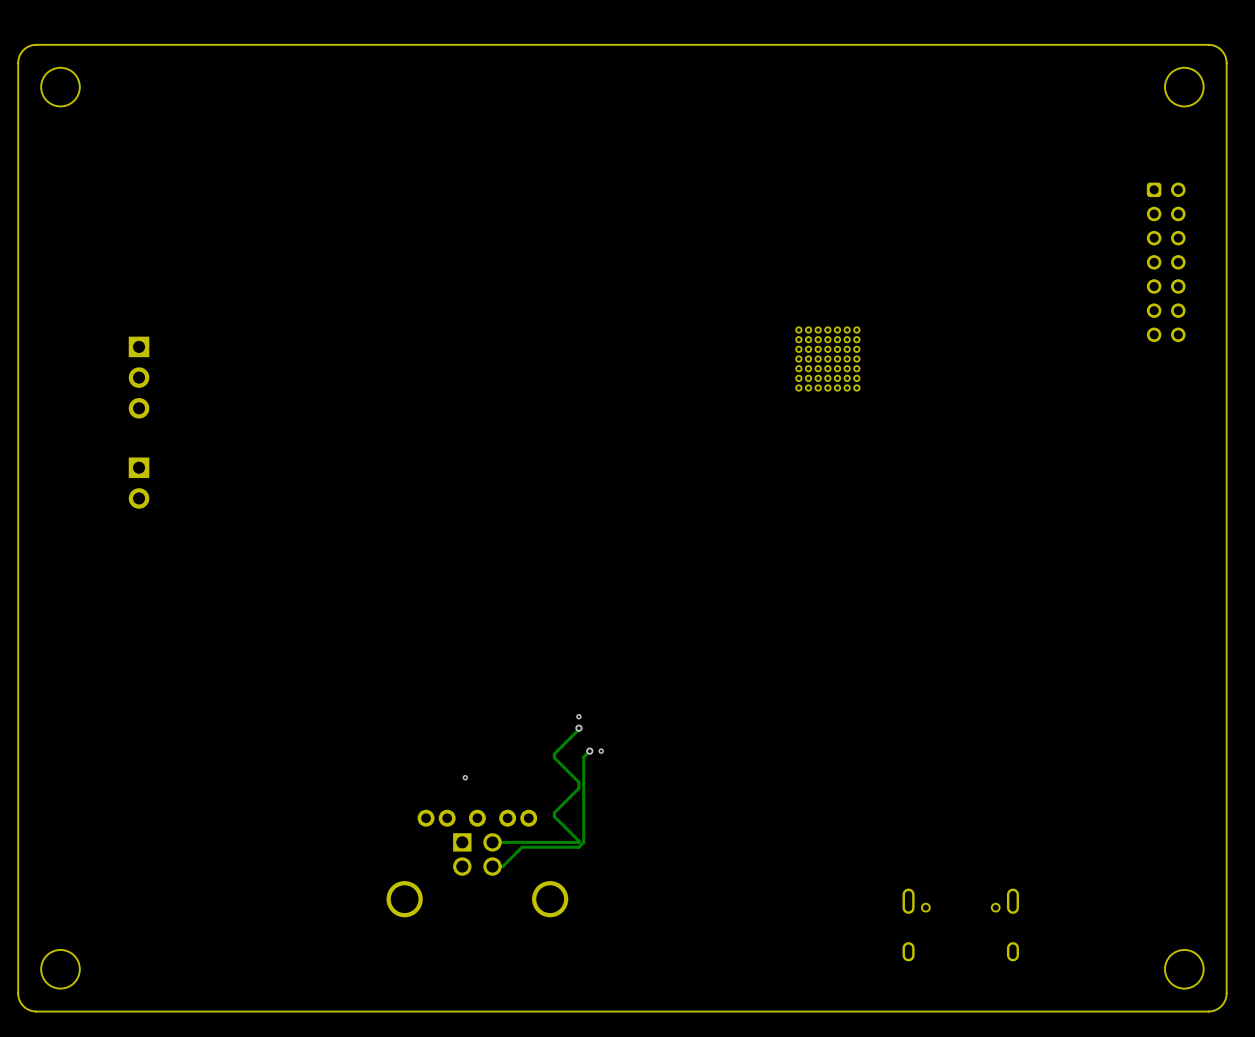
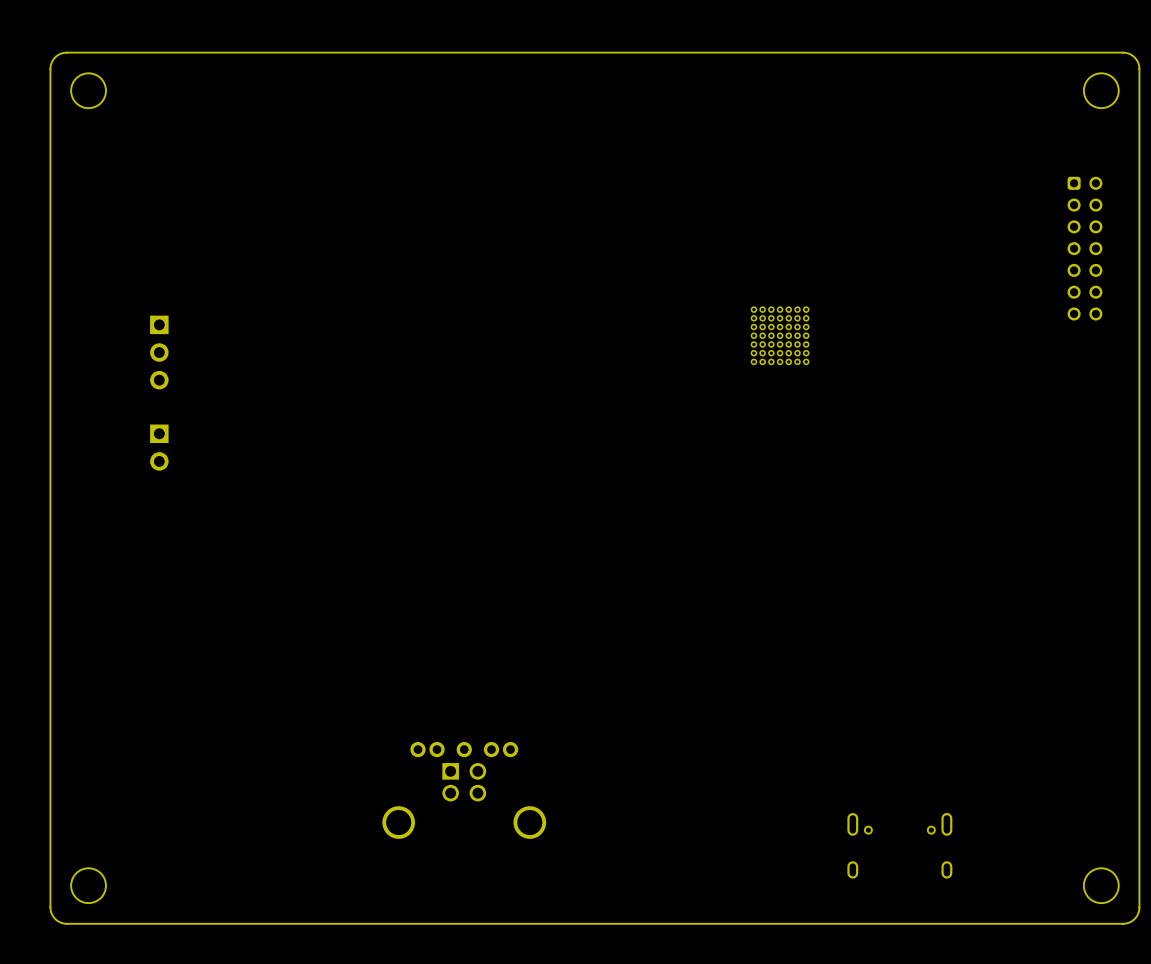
via: (578, 716) -> none
track: (578, 728) (554, 754) (554, 757) (578, 782) (578, 788) (554, 812) (554, 816) (578, 842) (492, 842) -> none
via: (578, 728) -> none
track: (589, 751) (583, 757) (583, 842) (578, 847) (522, 847) (502, 866) (492, 866) -> none
via: (589, 751) -> none
via: (601, 751) -> none
via: (465, 777) -> none

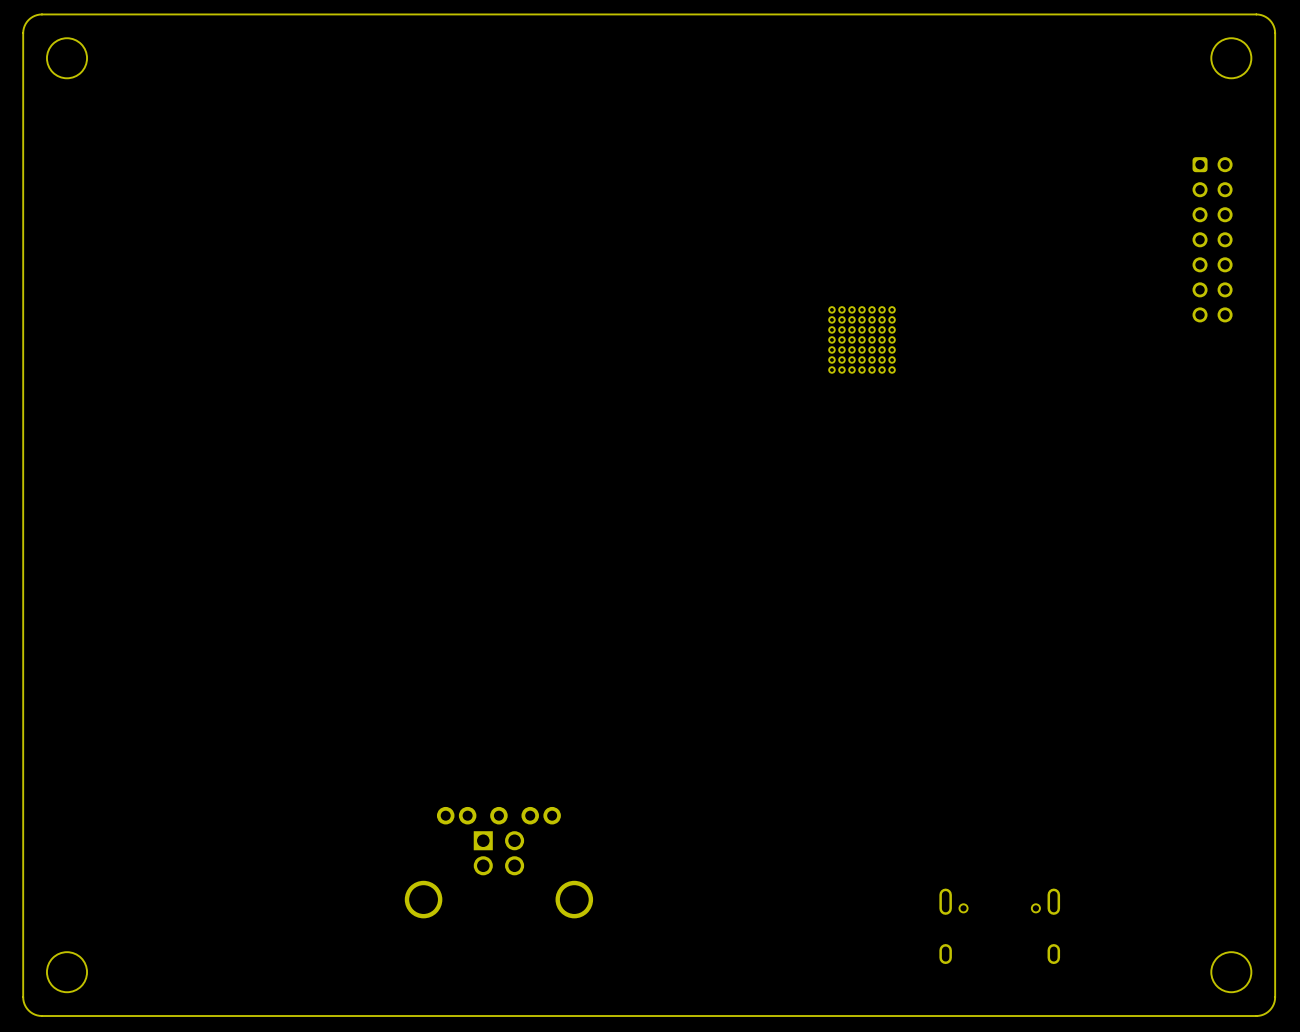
part: (159, 352) -> none
part: (159, 447) -> none

